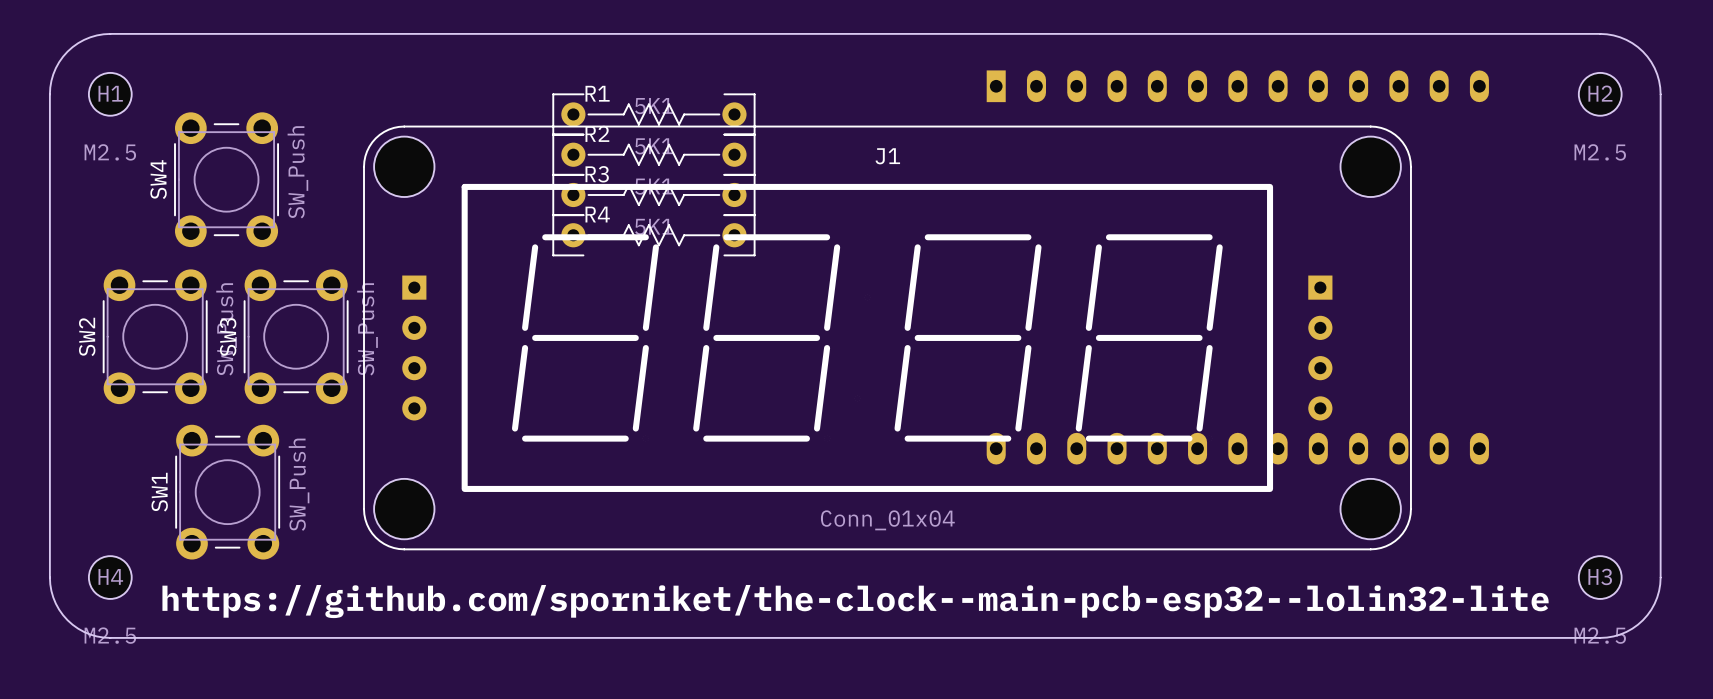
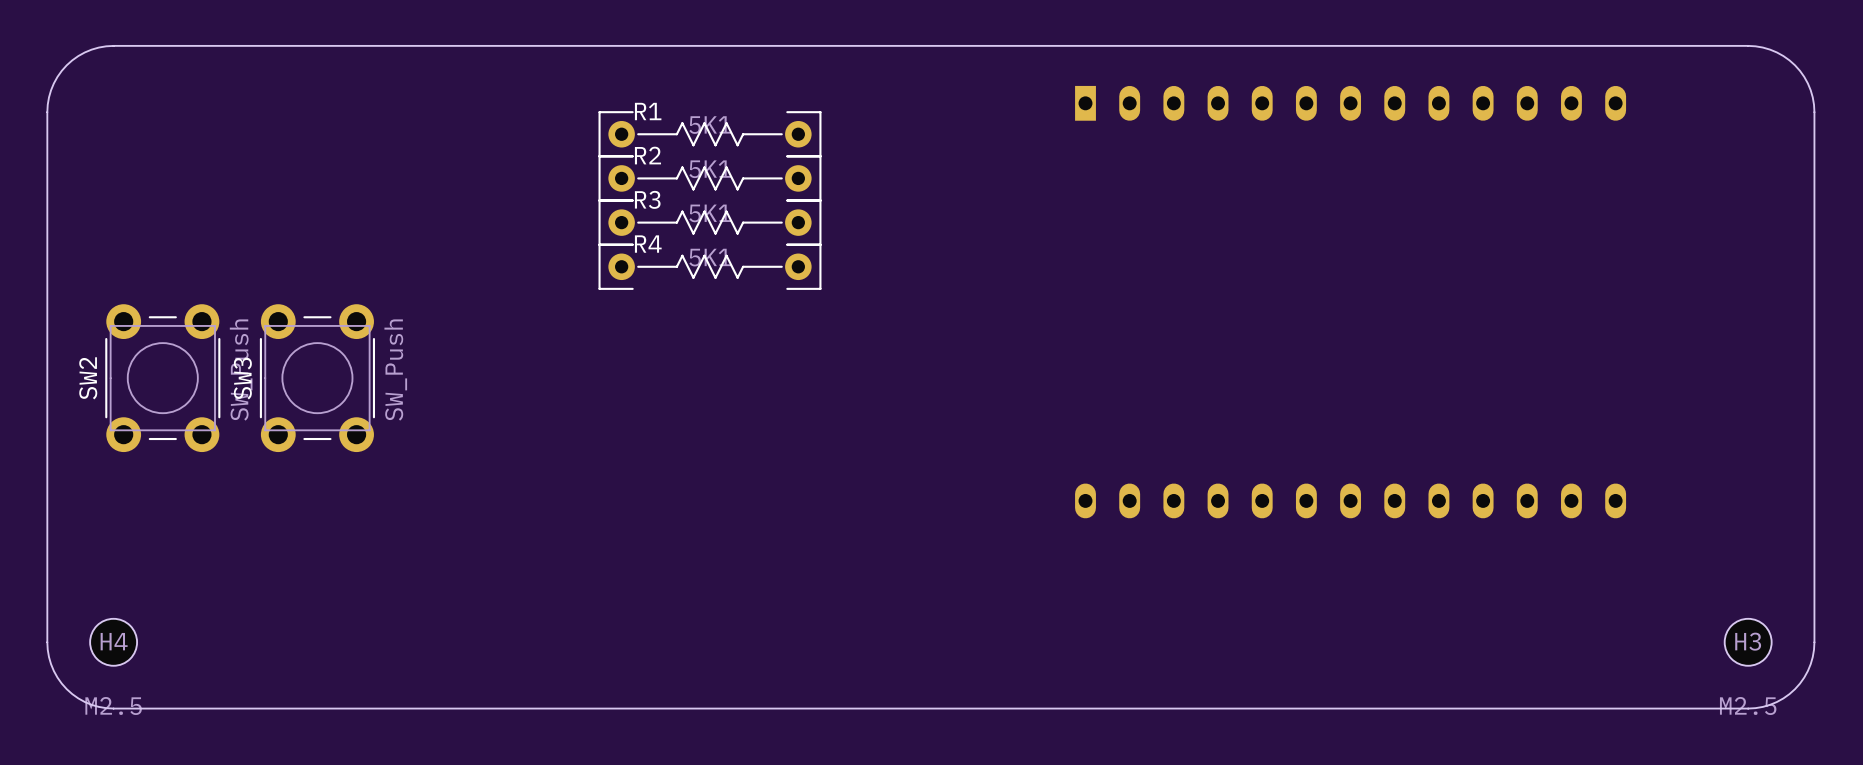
H1: M2.5 (110, 94) -> none
H2: M2.5 (1600, 94) -> none
SW4: SW_Push (226, 179) -> none
J1: Conn_01x04 (887, 337) -> none
SW1: SW_Push (227, 492) -> none
text: https://github.com/sporniket/the-clock--main-pcb-esp32--lolin32-lite (855, 601) -> none

